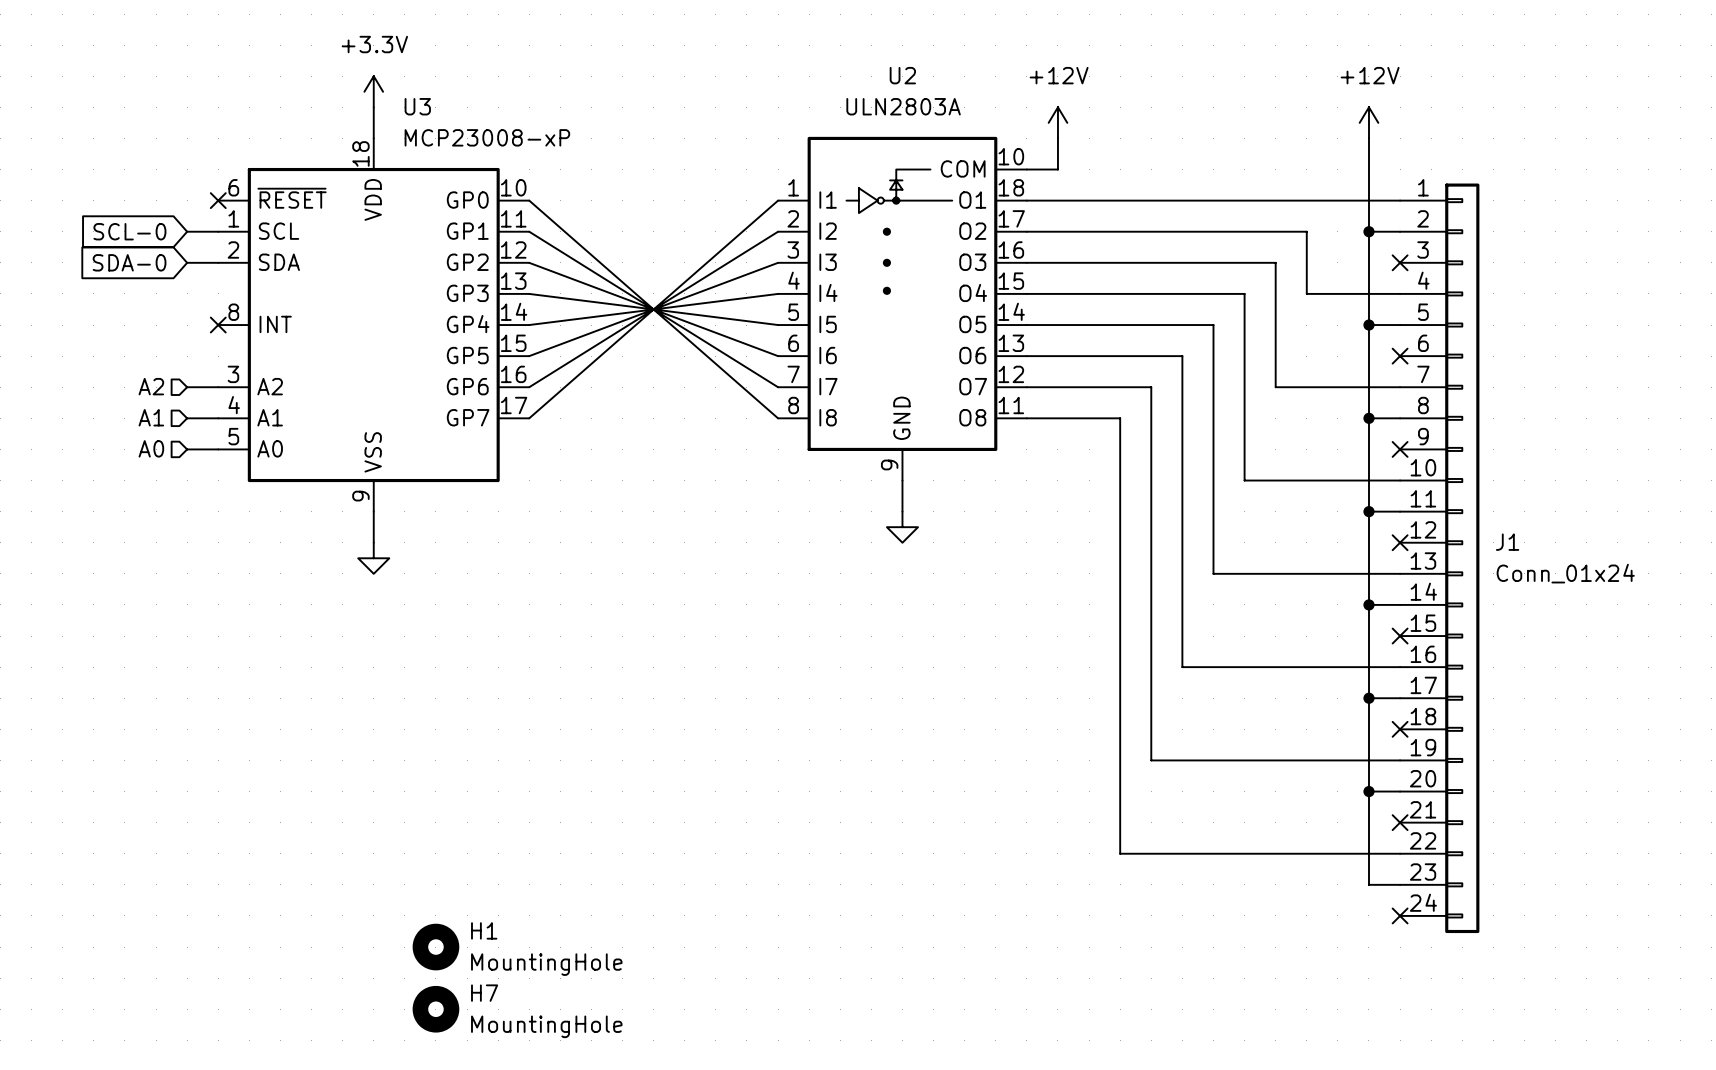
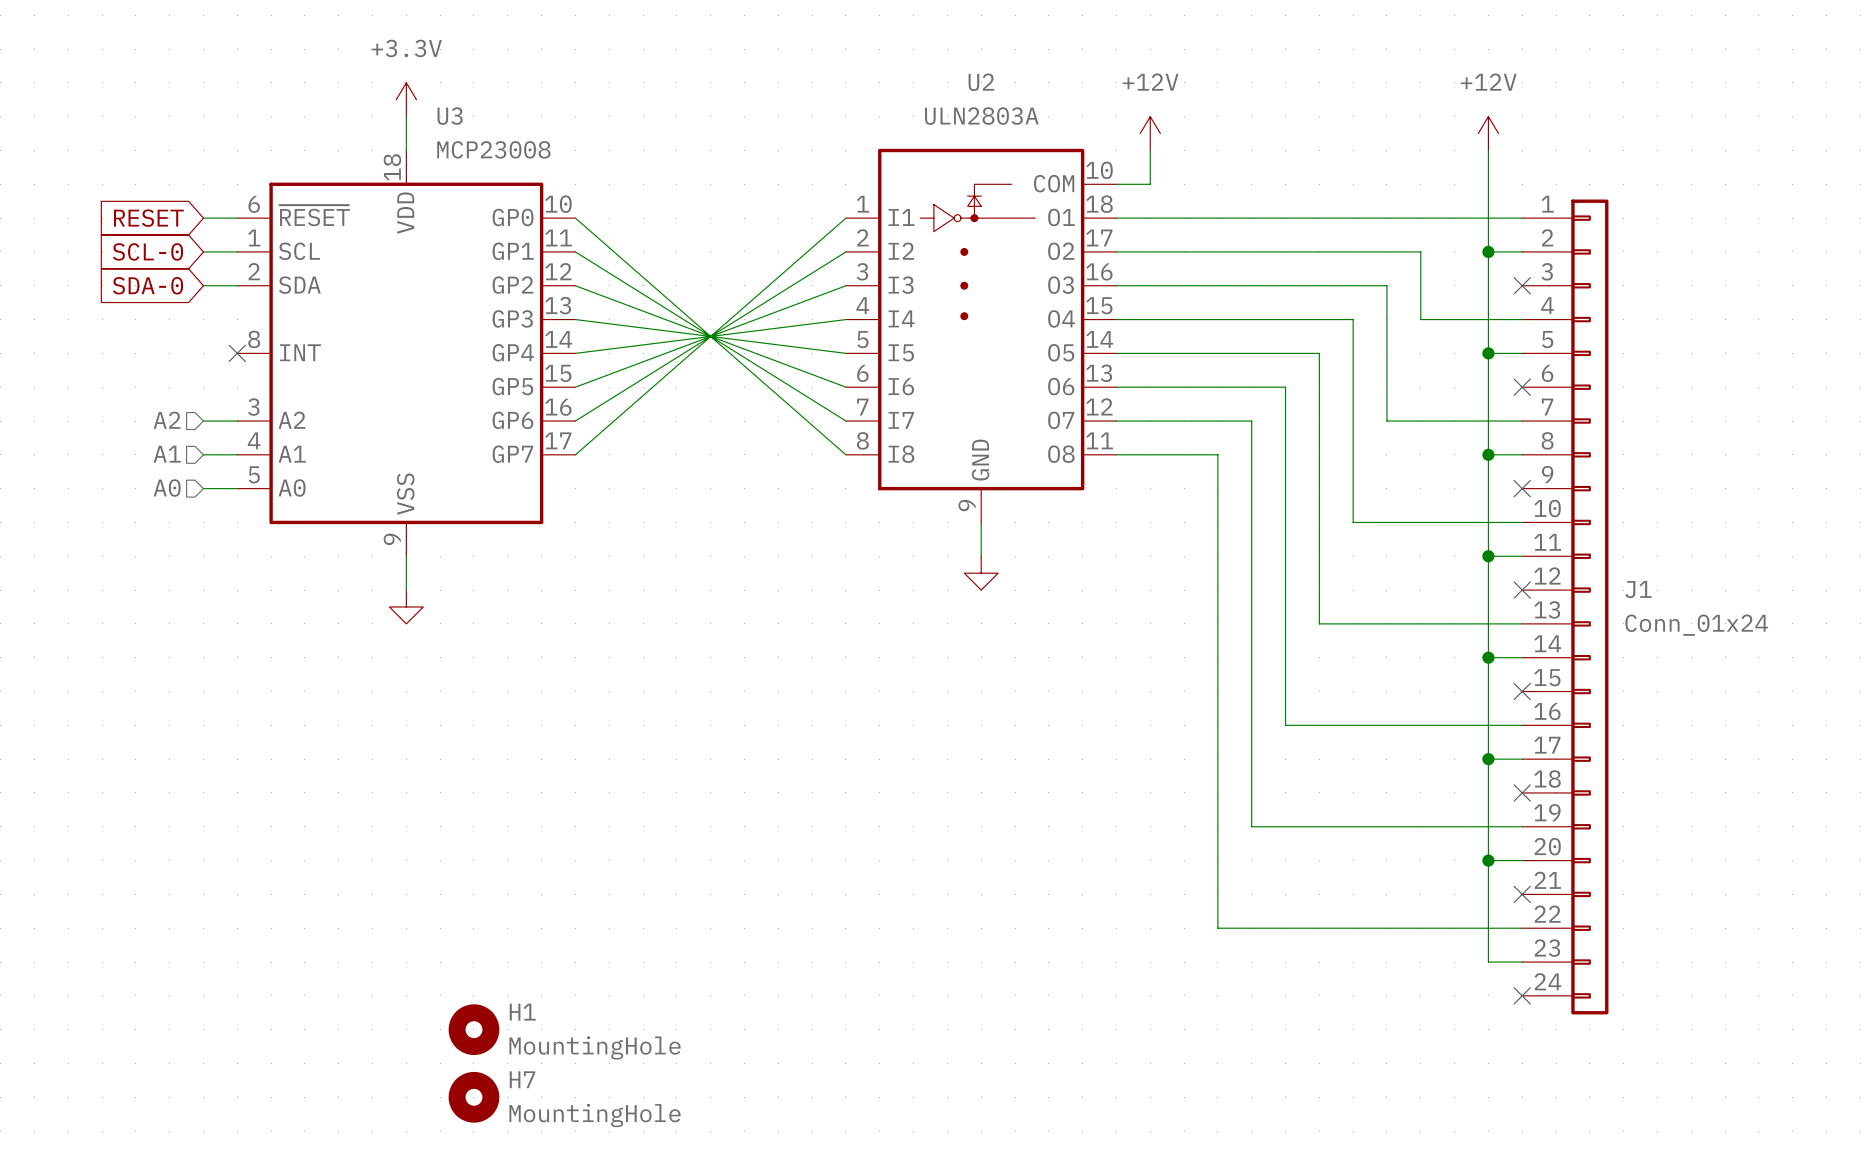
U3 value: MCP23008-xP (487, 137) -> MCP23008 (493, 149)
global label: none -> RESET (148, 218)
wire: none -> (203, 218) (237, 218)
no-connect mark: (218, 200) -> none

